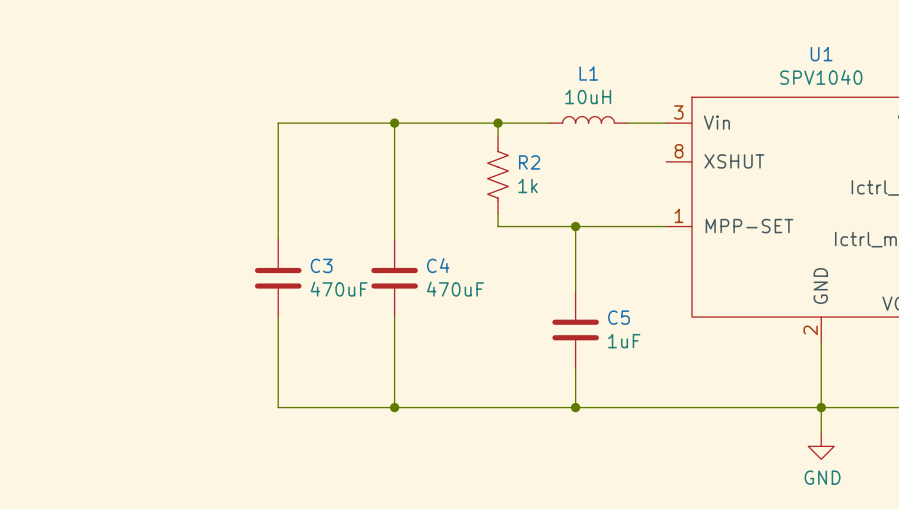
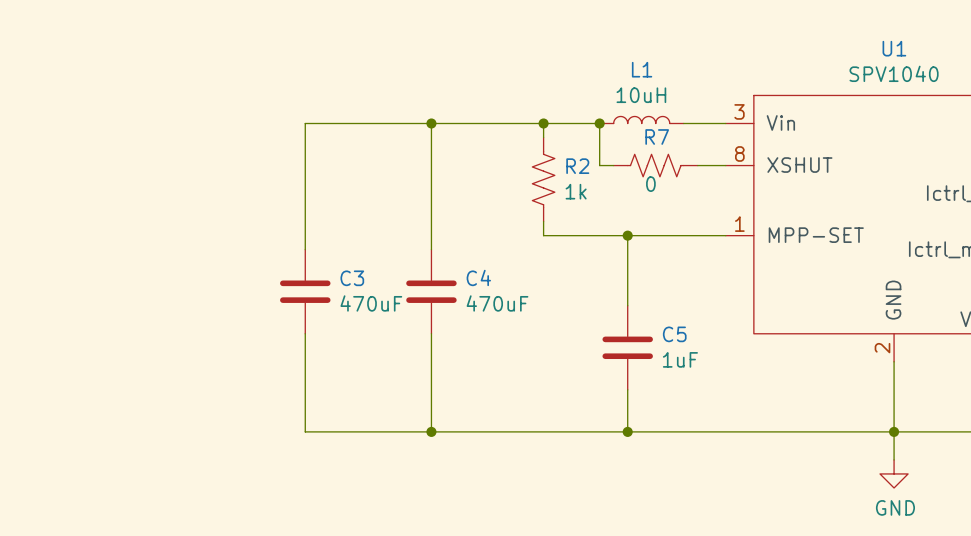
wire: none -> (599, 123) (599, 165) (613, 165)
junction: none -> (599, 123)
R7: none -> 0 (655, 165)
wire: none -> (697, 165) (725, 165)

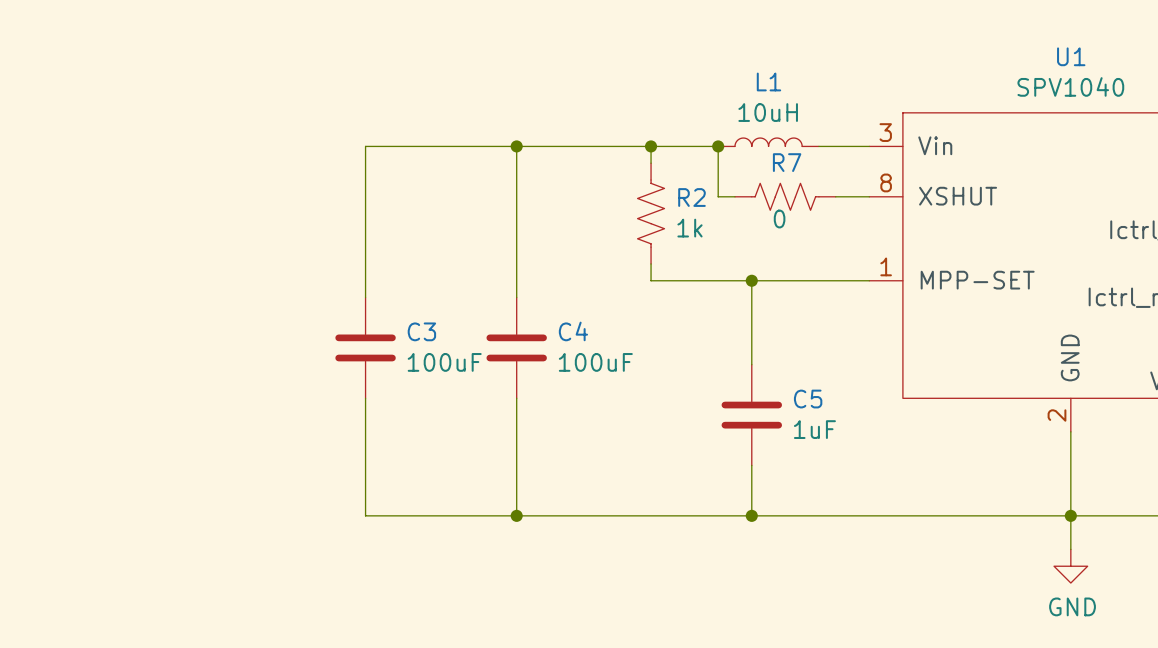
C3 value: 470uF (371, 303) -> 100uF (444, 362)
C4 value: 470uF (497, 303) -> 100uF (595, 362)

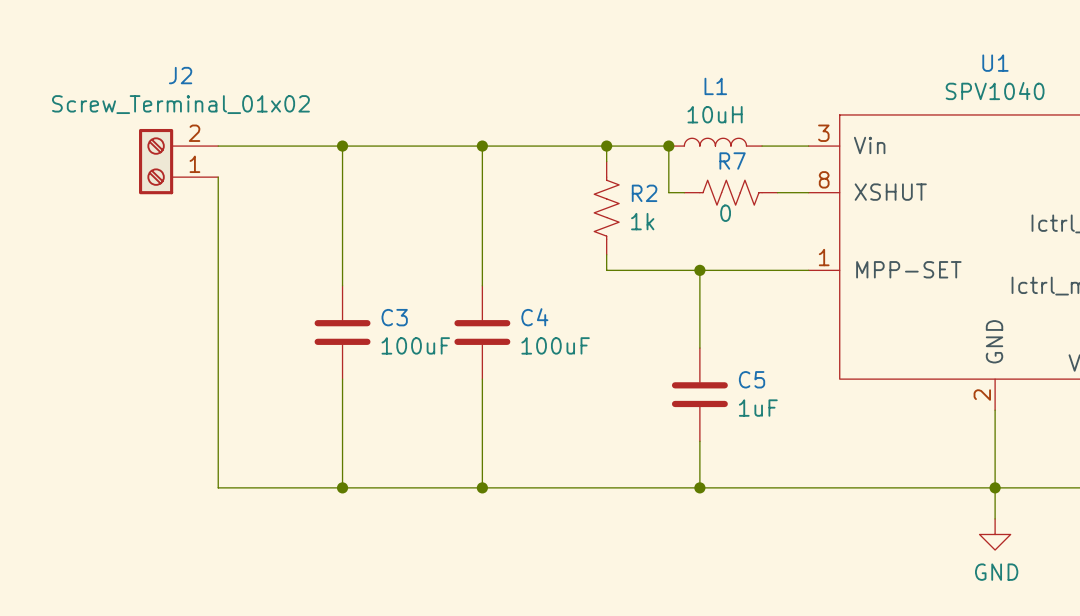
wire: none -> (218, 146) (342, 146)
junction: none -> (342, 146)
J2: none -> Screw_Terminal_01x02 (178, 161)
wire: none -> (218, 177) (218, 487) (342, 487)
junction: none -> (342, 487)

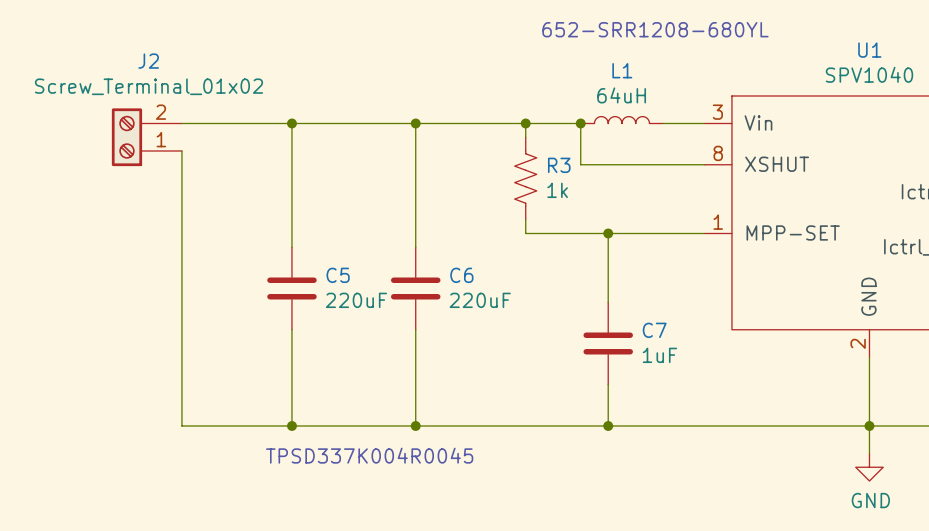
text: none -> 652-SRR1208-680YL (655, 29)
L1 value: 10uH (715, 114) -> 64uH (621, 95)
R7: 0 (730, 192) -> none
R2 name: R2 (644, 193) -> R3 (559, 165)
C3 name: C3 (394, 317) -> C5 (338, 275)
C4 name: C4 (534, 317) -> C6 (461, 275)
C3 value: 100uF (415, 345) -> 220uF (356, 300)
C4 value: 100uF (555, 345) -> 220uF (480, 300)
C5 name: C5 (752, 379) -> C7 (654, 330)
text: none -> TPSD337K004R0045 (369, 455)

